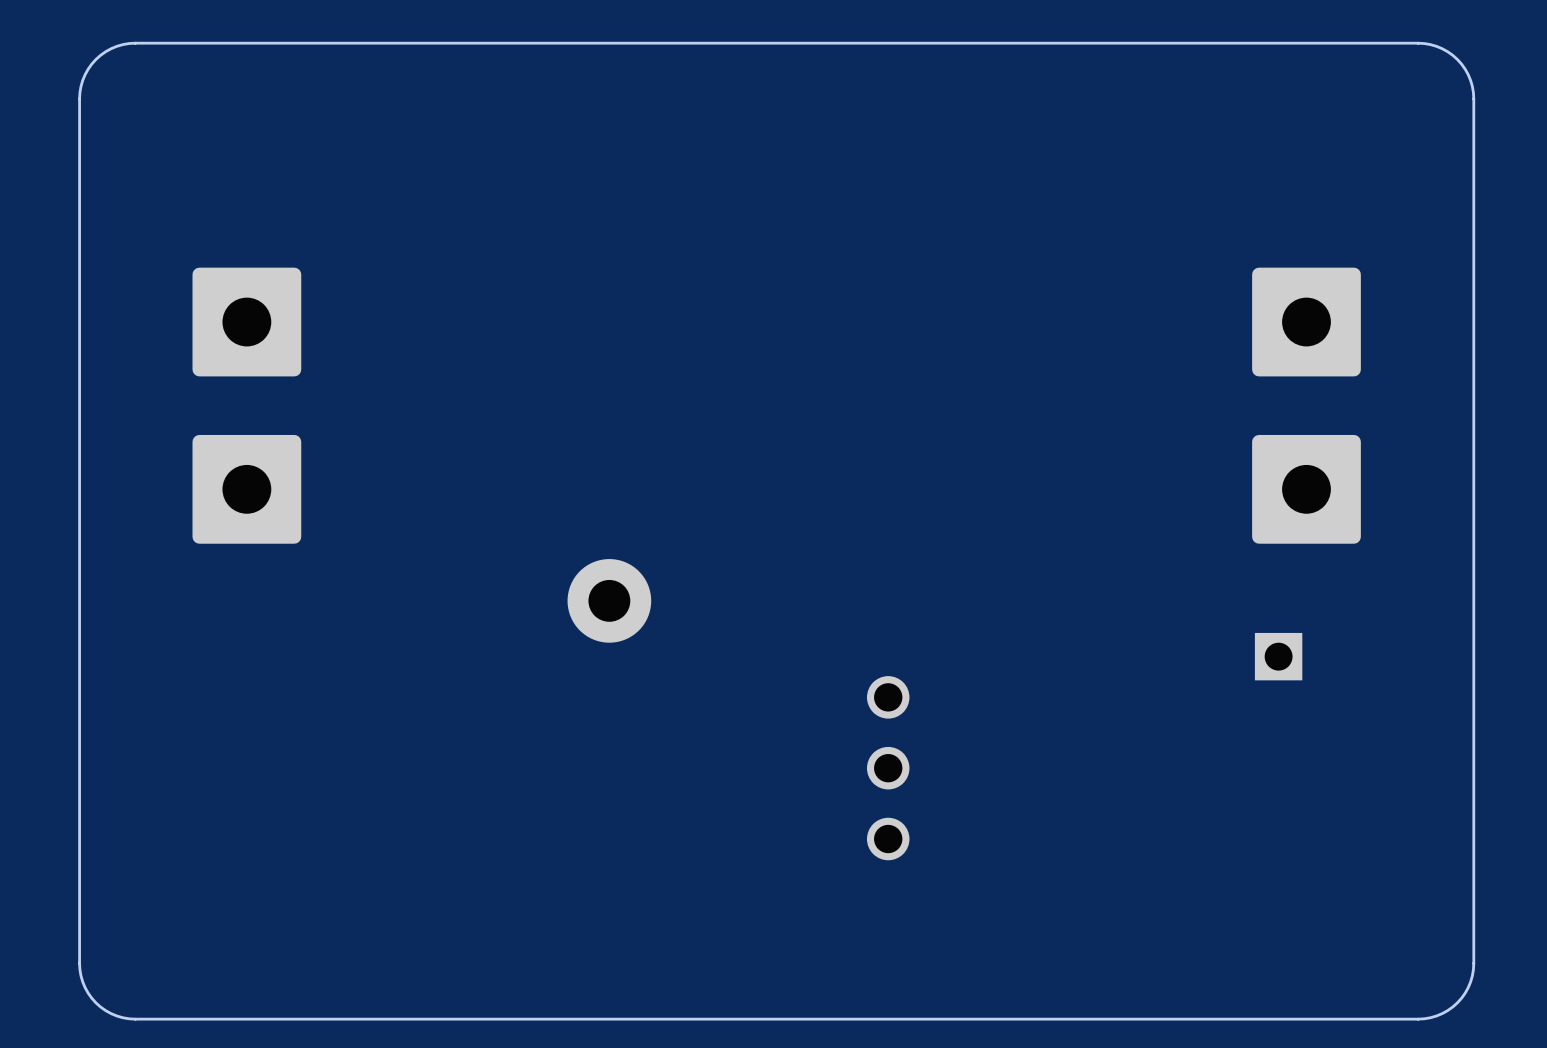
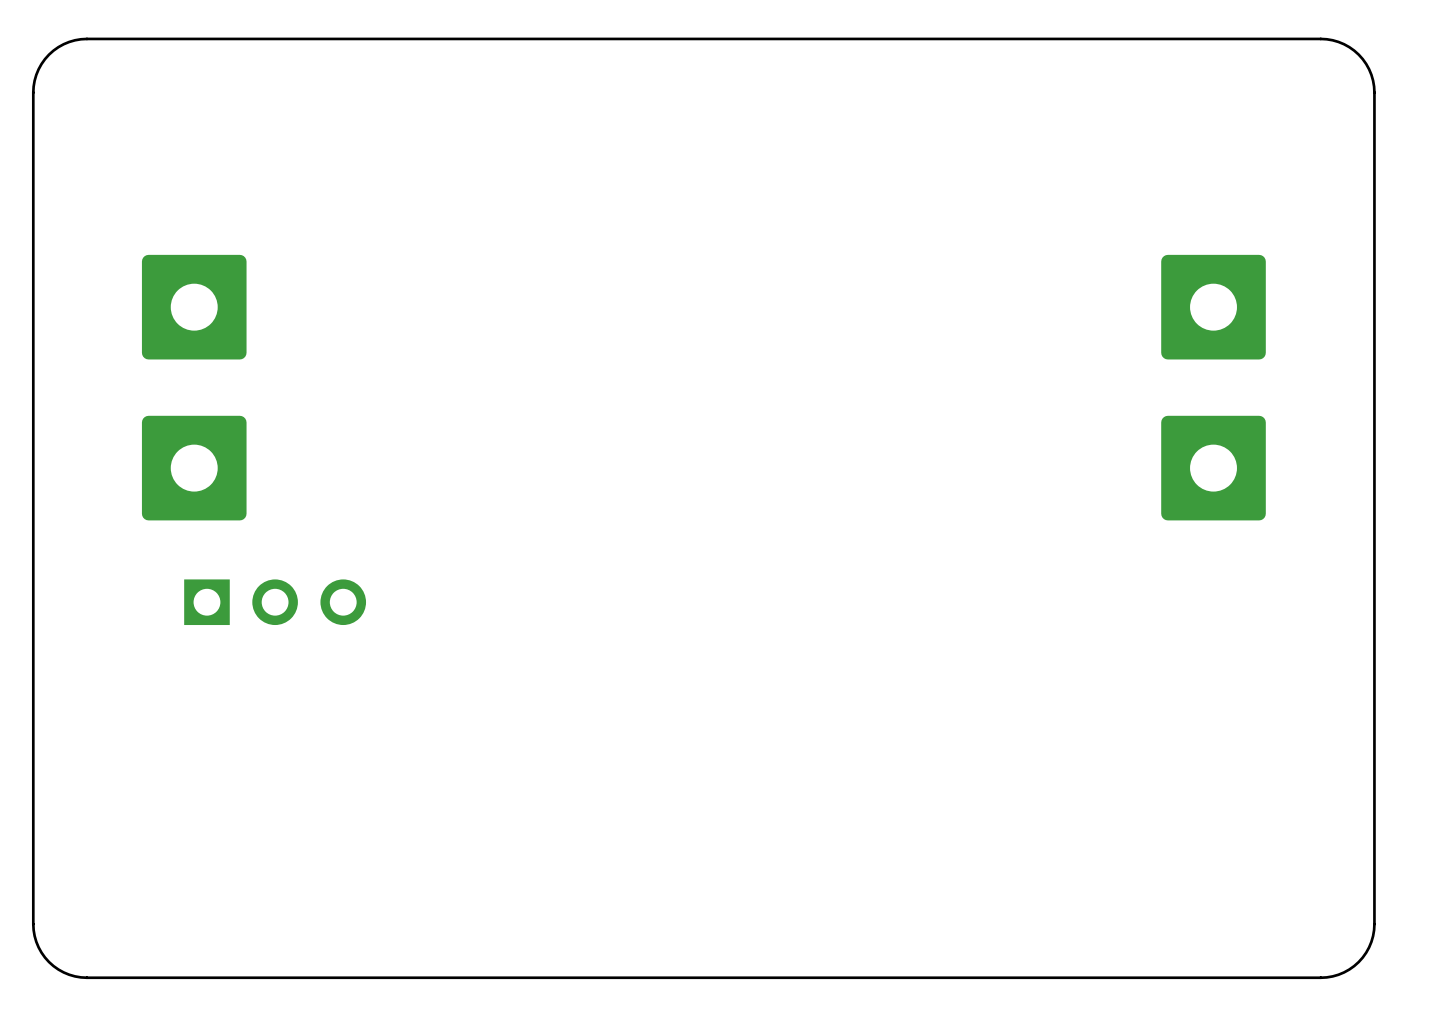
part: (609, 600) -> none
part: none -> (275, 602)
part: (1278, 656) -> none
part: (888, 768) -> none

